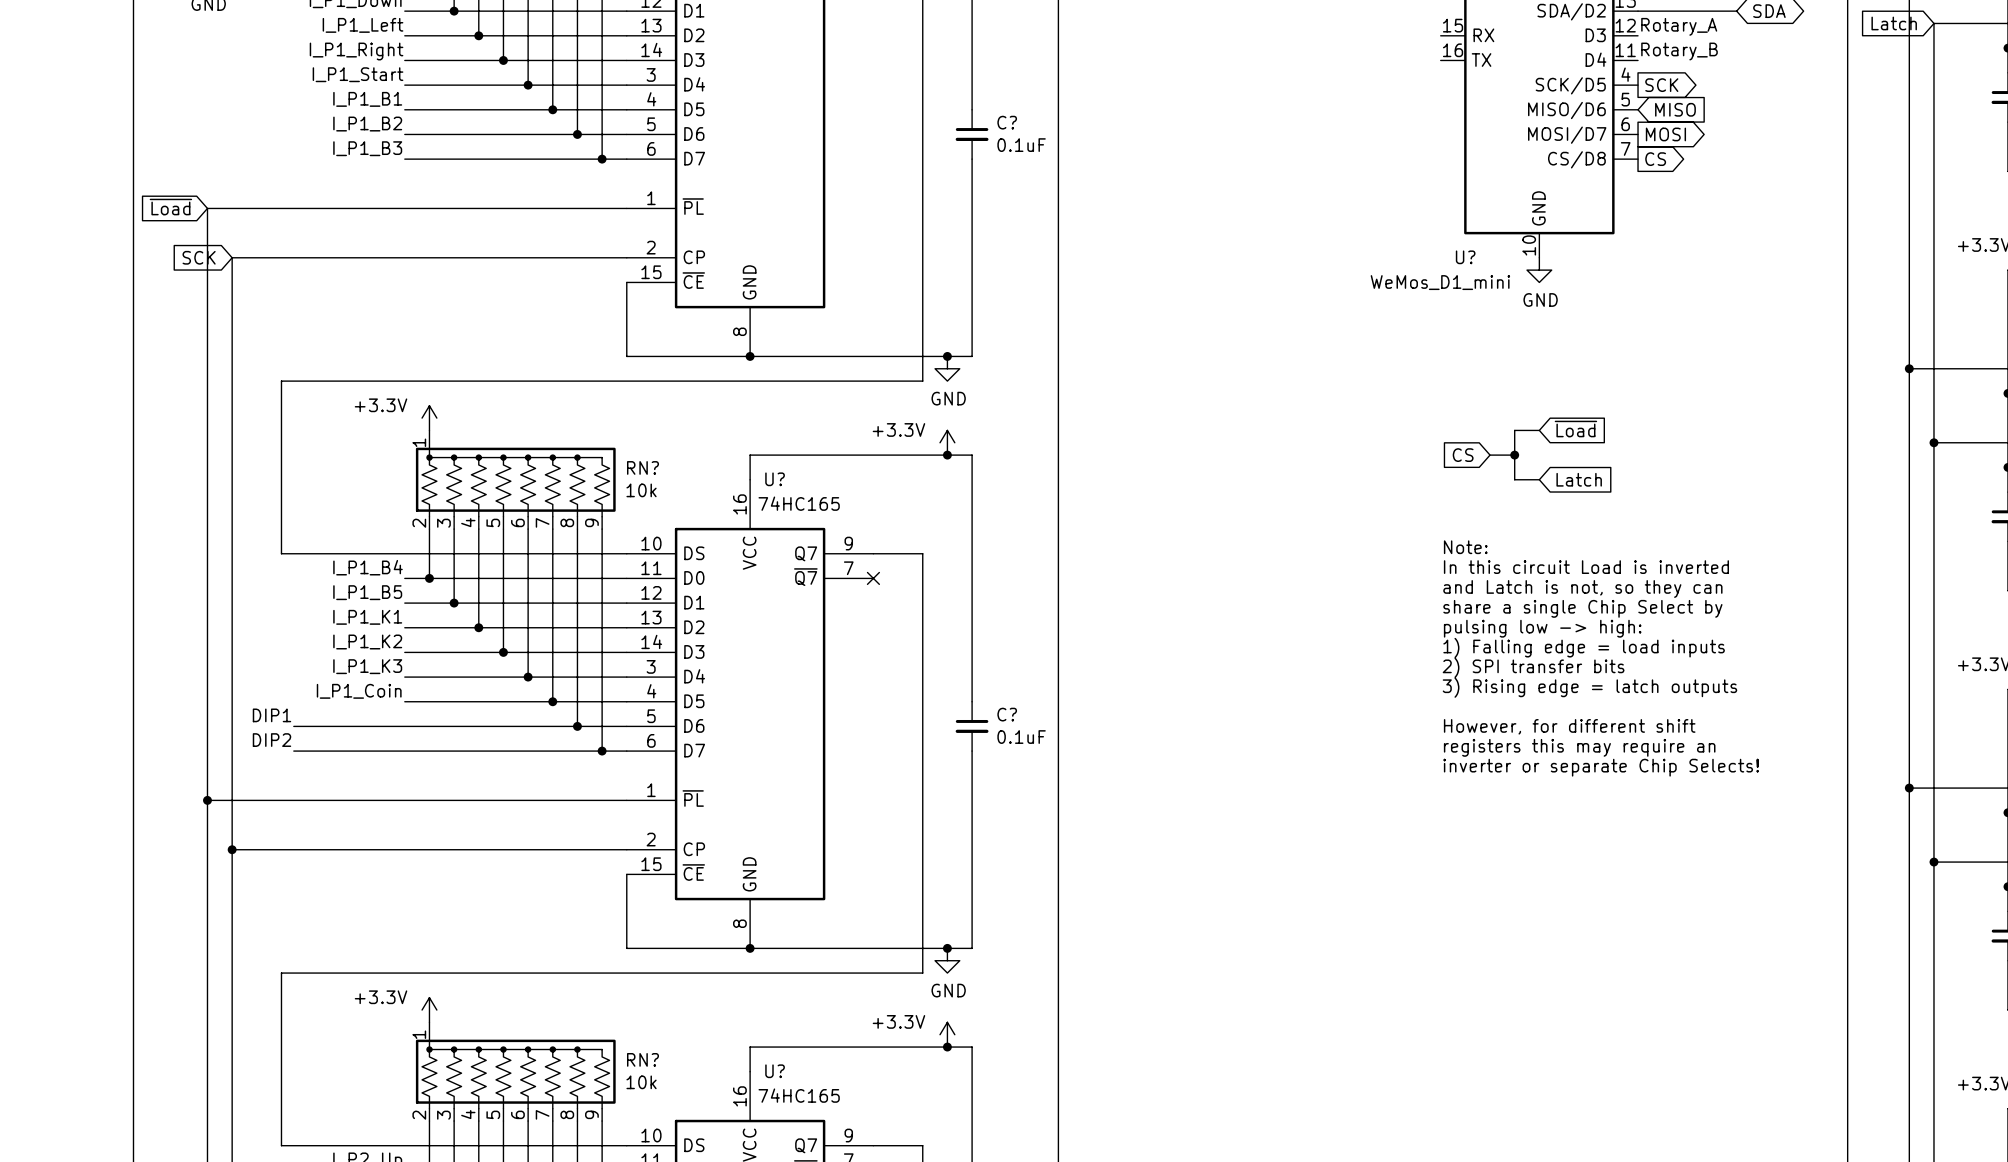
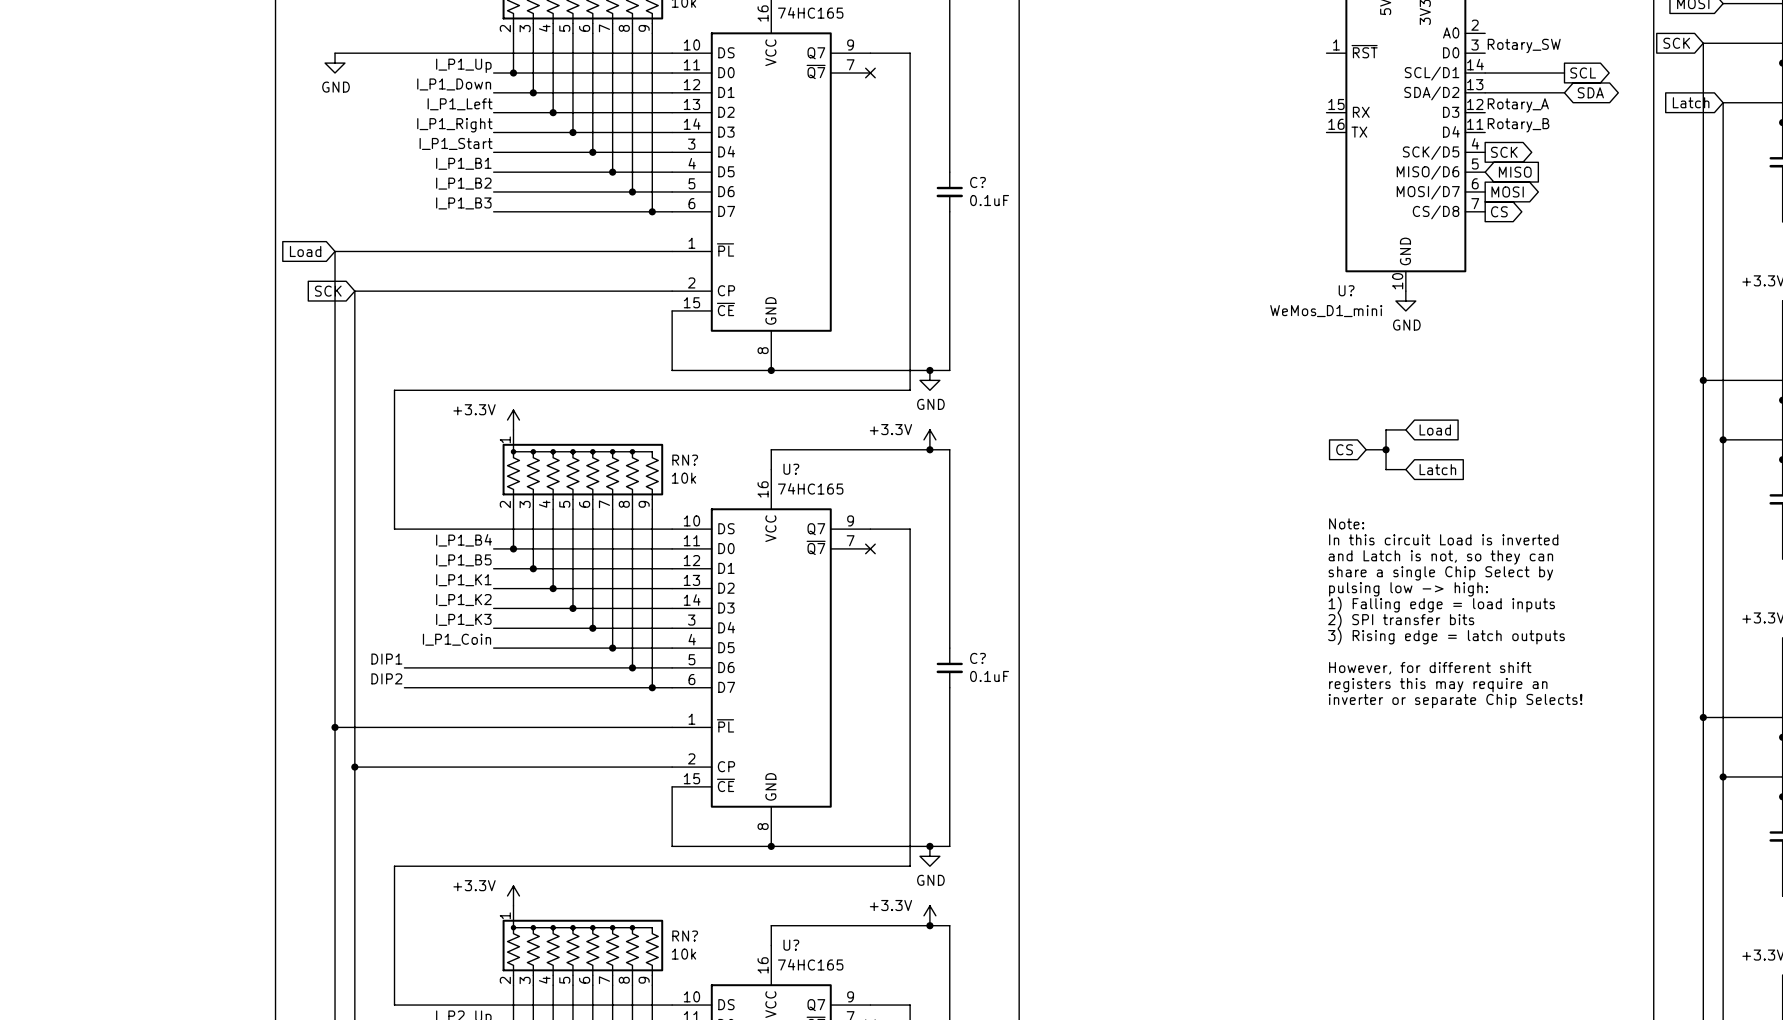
global label: ~{Load} (170, 207) -> Load (305, 251)
global label: ~{Load} (1575, 429) -> Load (1435, 429)

